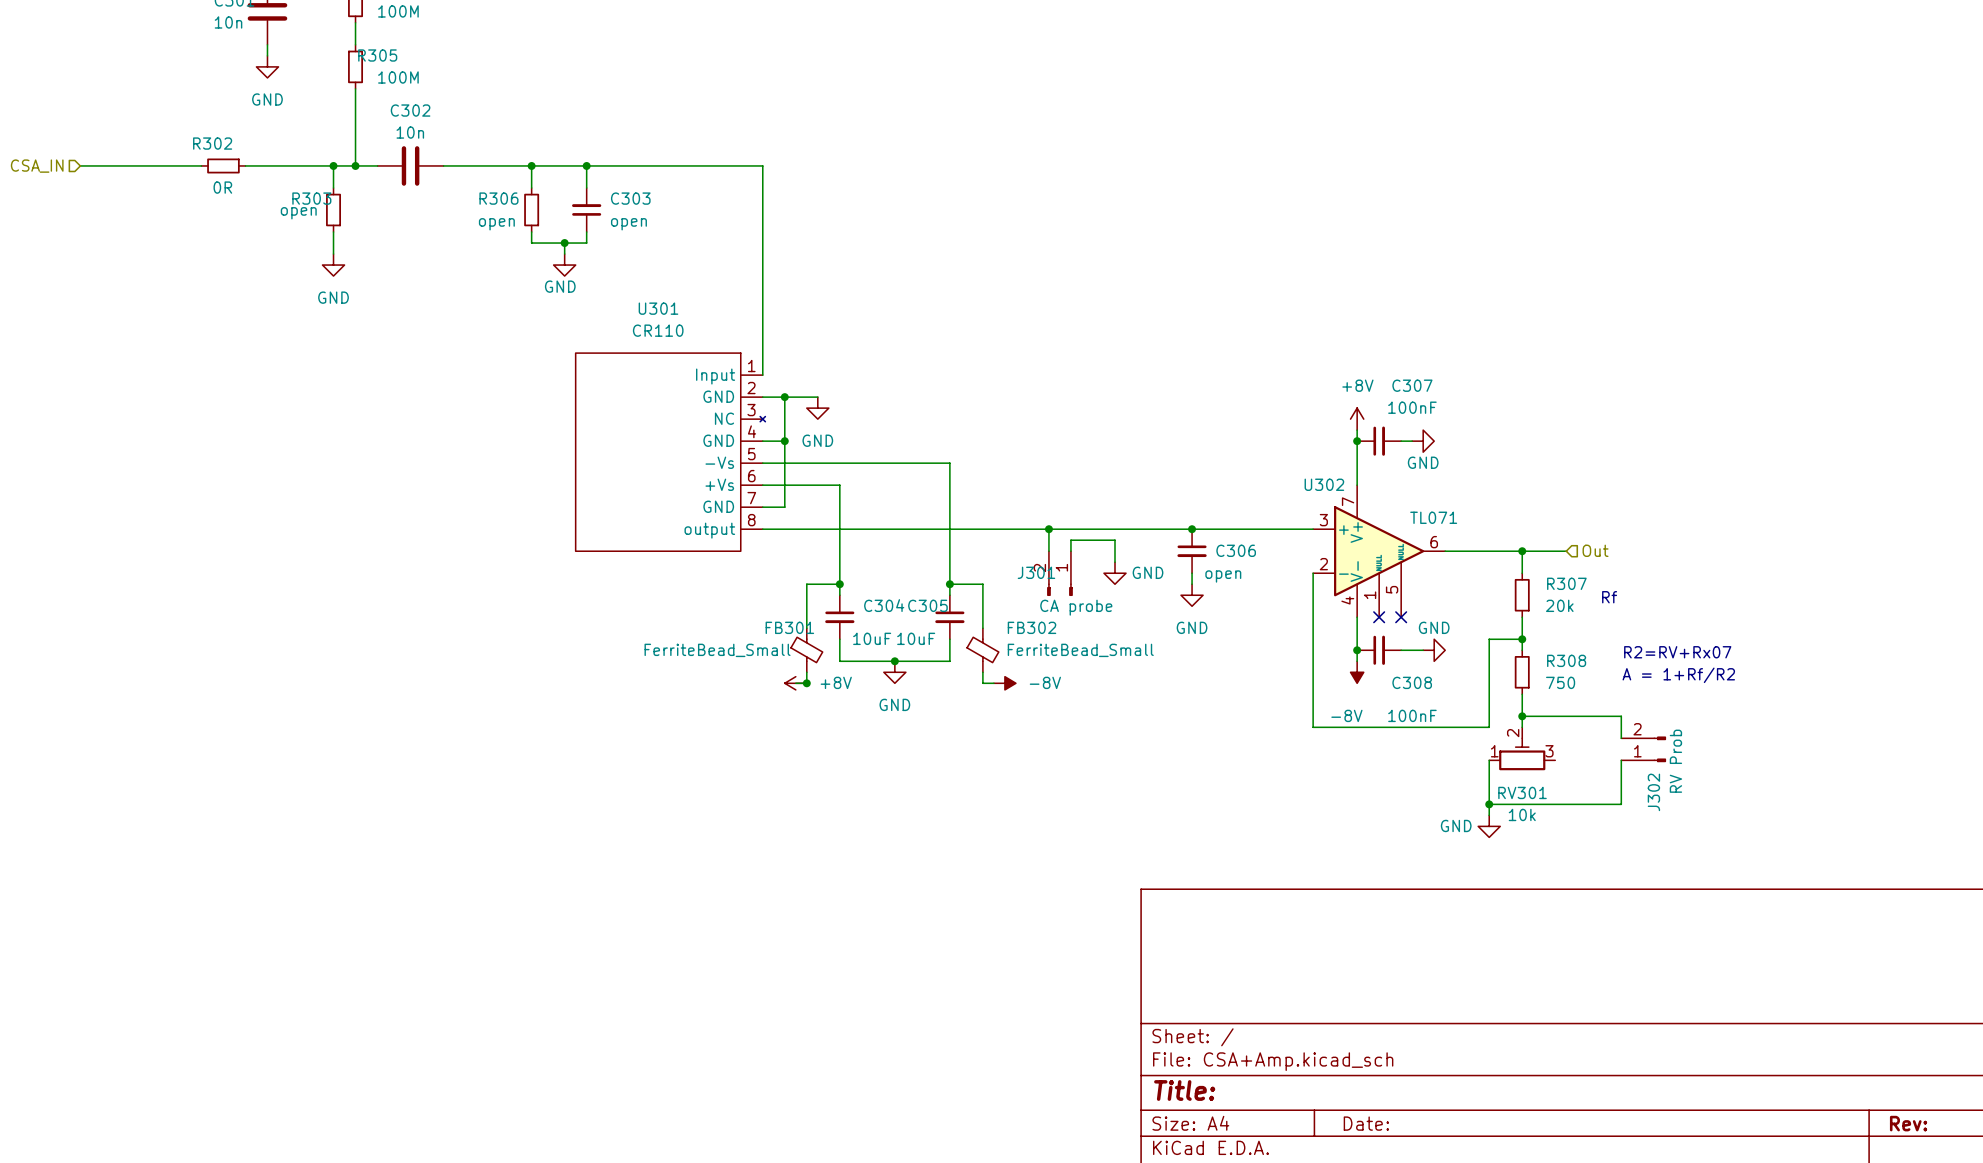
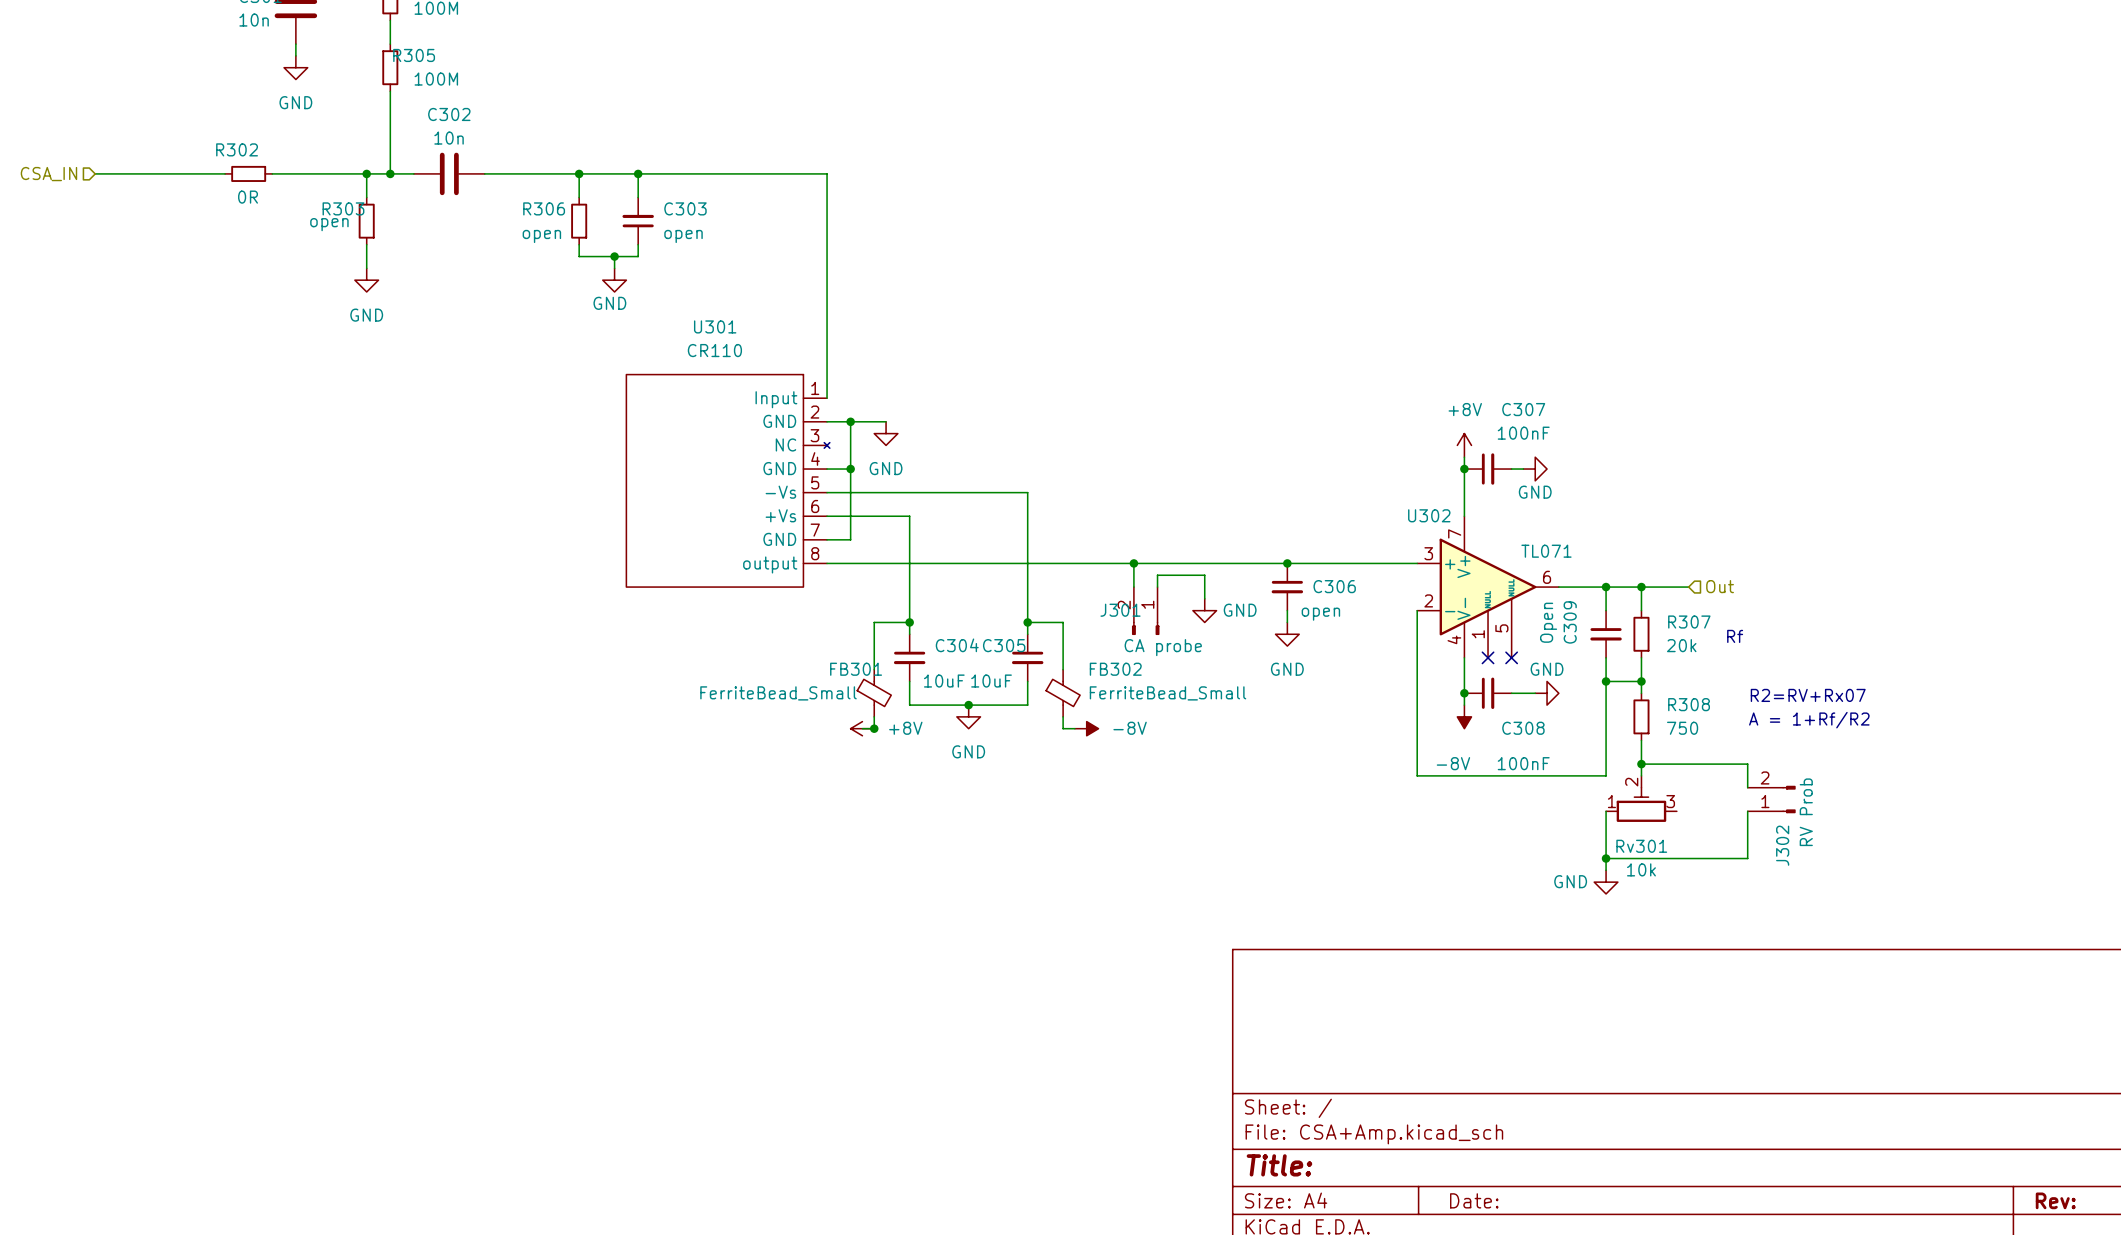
wire: none -> (1606, 587) (1606, 610)
junction: none -> (1606, 587)
C309: none -> Open (1606, 634)
wire: none -> (1606, 657) (1606, 681)
junction: none -> (1606, 681)
RV301 name: RV301 (1522, 792) -> Rv301 (1641, 846)

